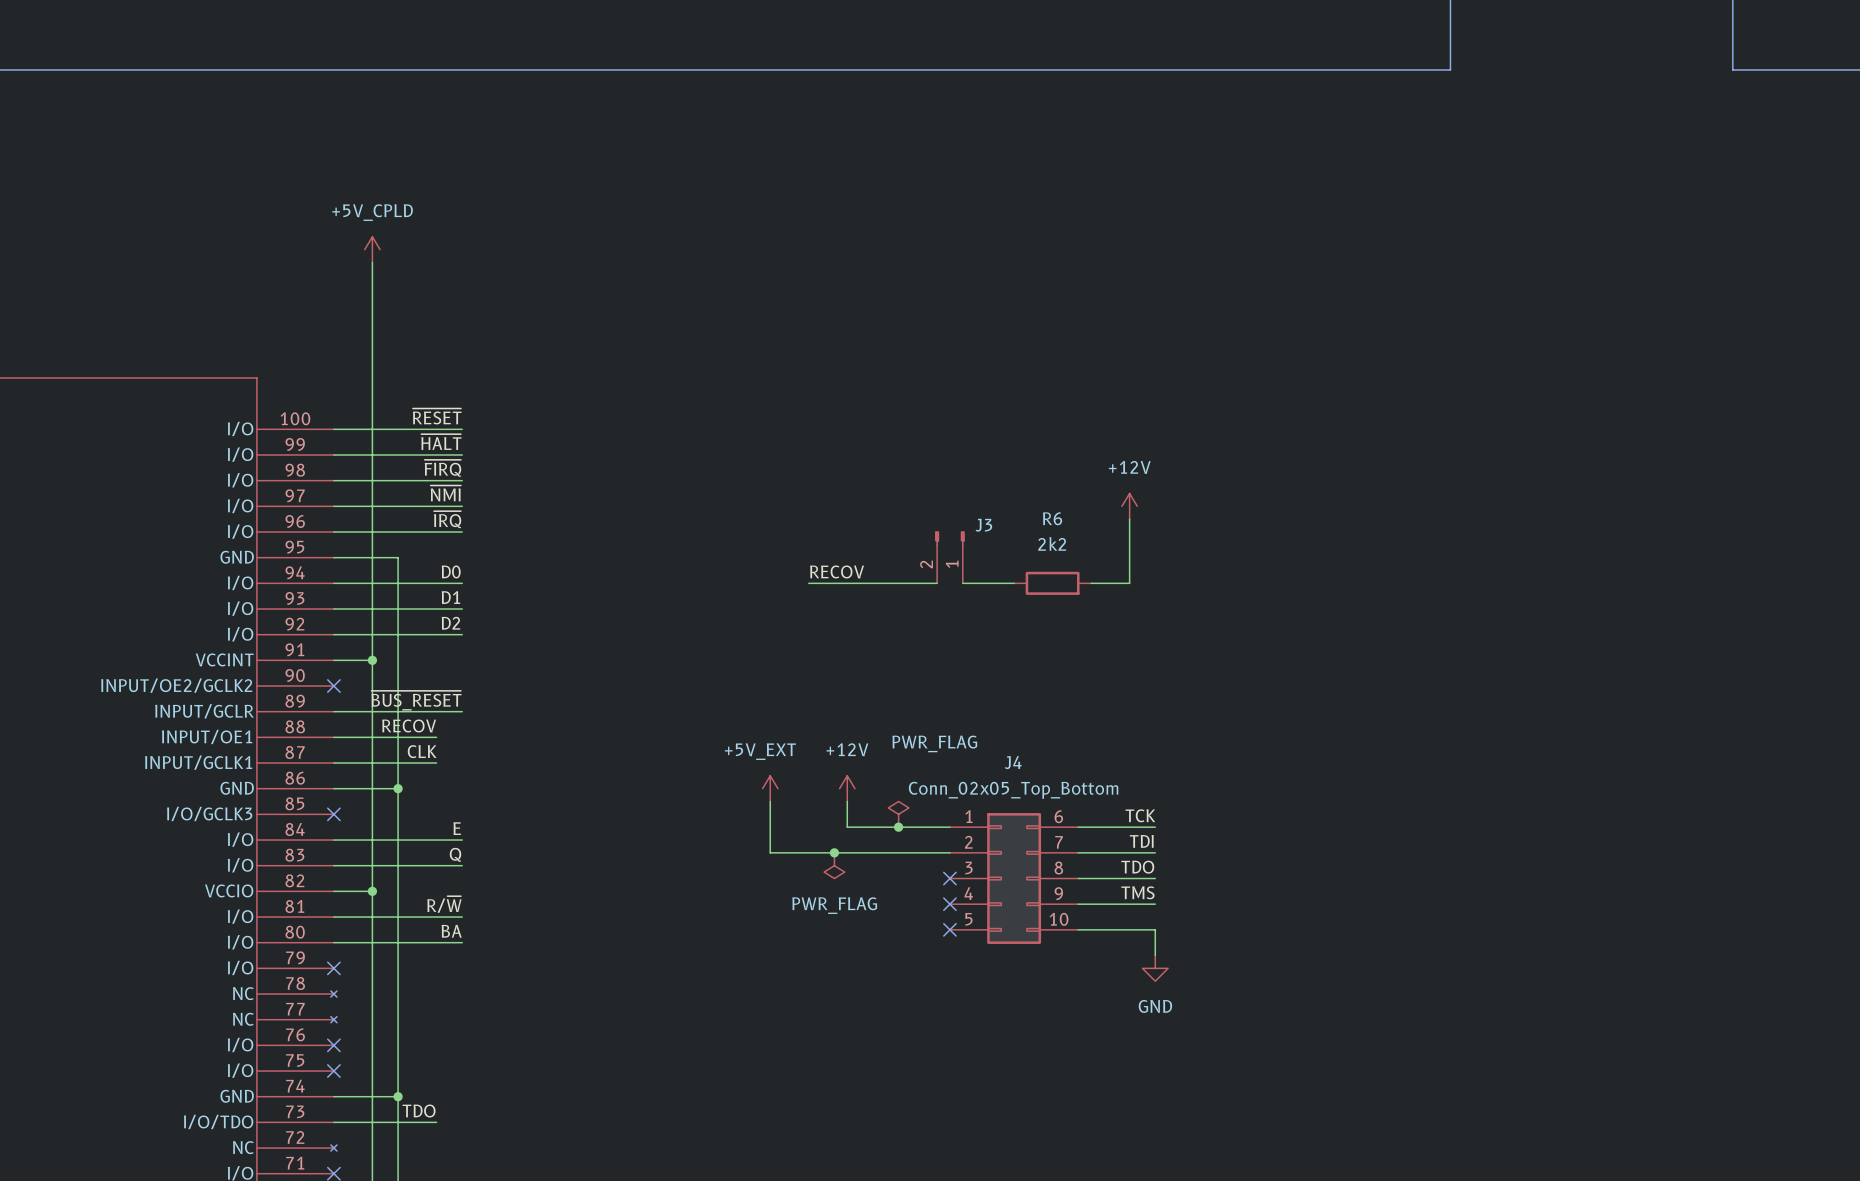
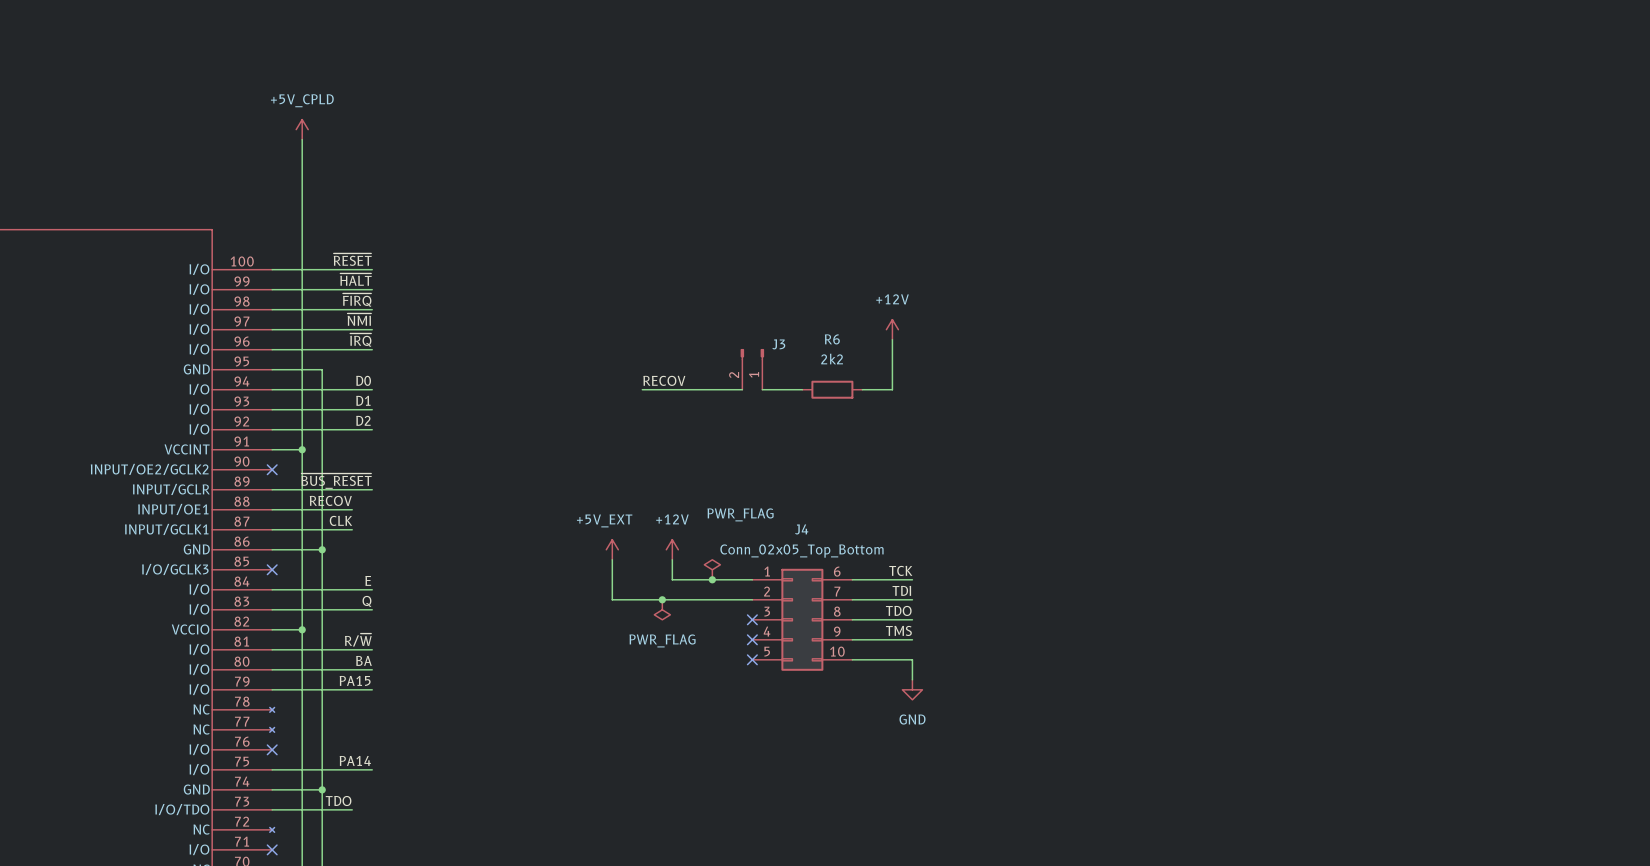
label: none -> PA15 (355, 680)
wire: none -> (272, 689) (372, 689)
no-connect mark: (333, 968) -> none
label: none -> PA14 (355, 760)
wire: none -> (272, 769) (372, 769)
no-connect mark: (333, 1071) -> none

